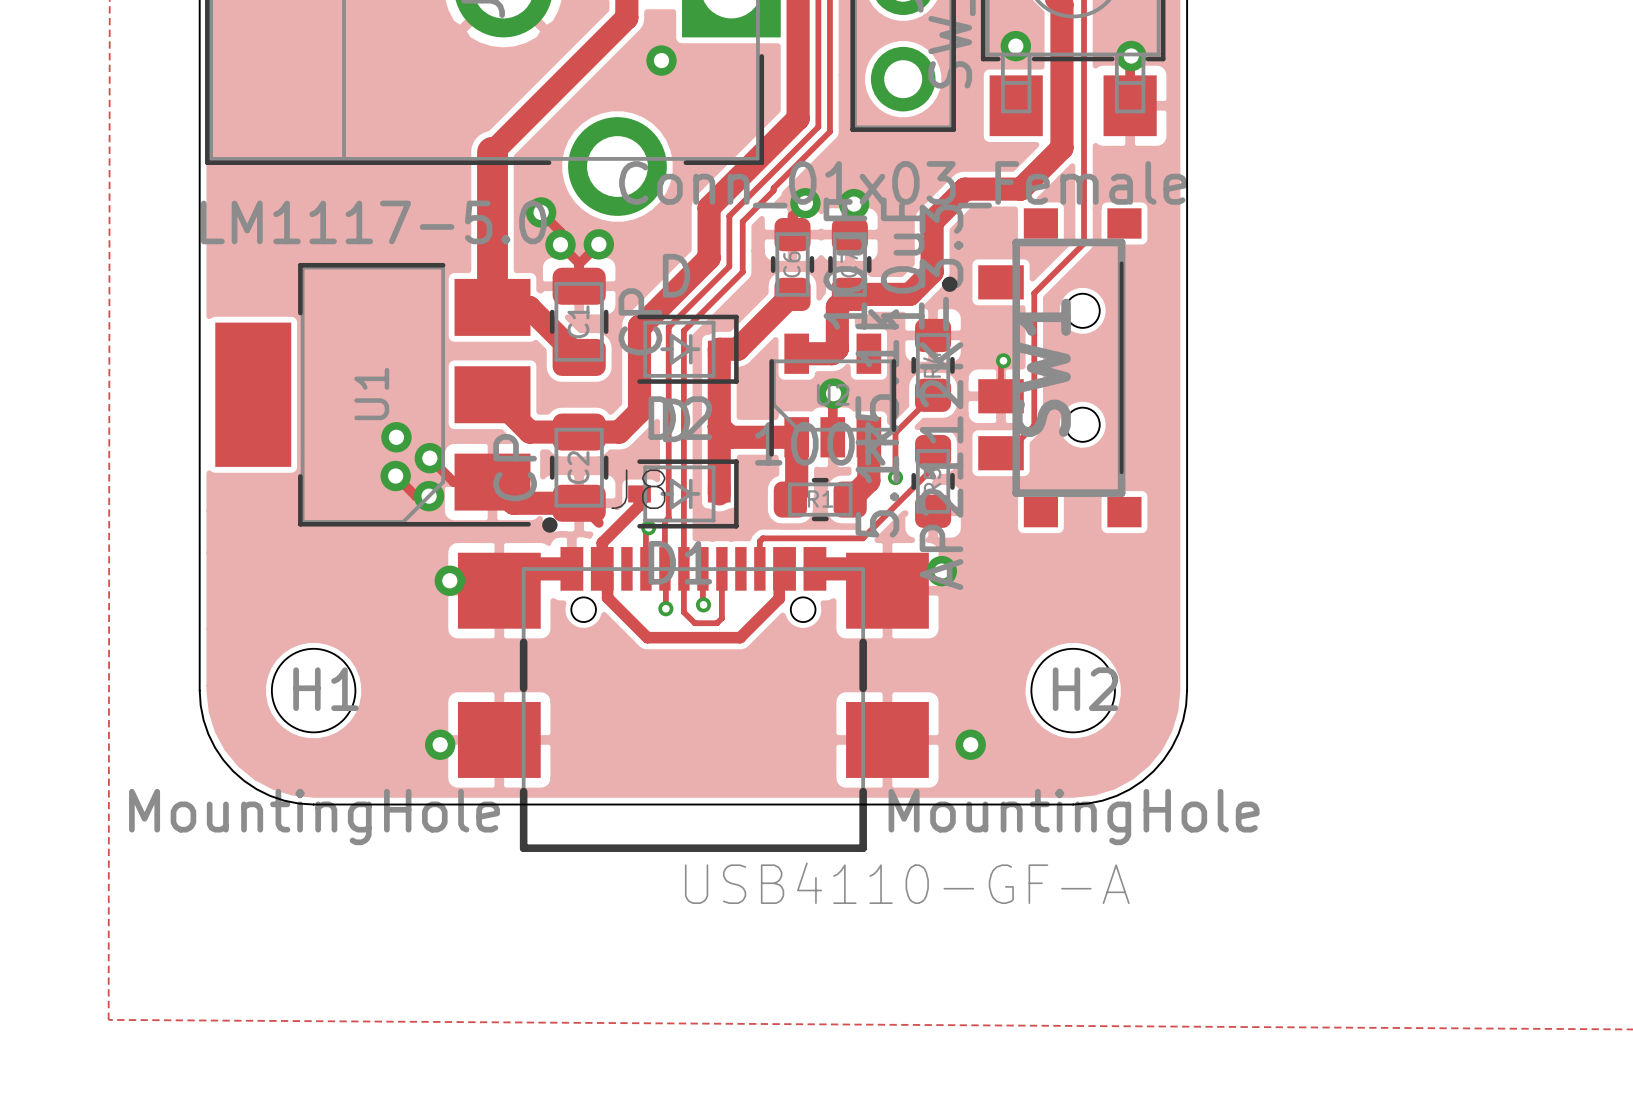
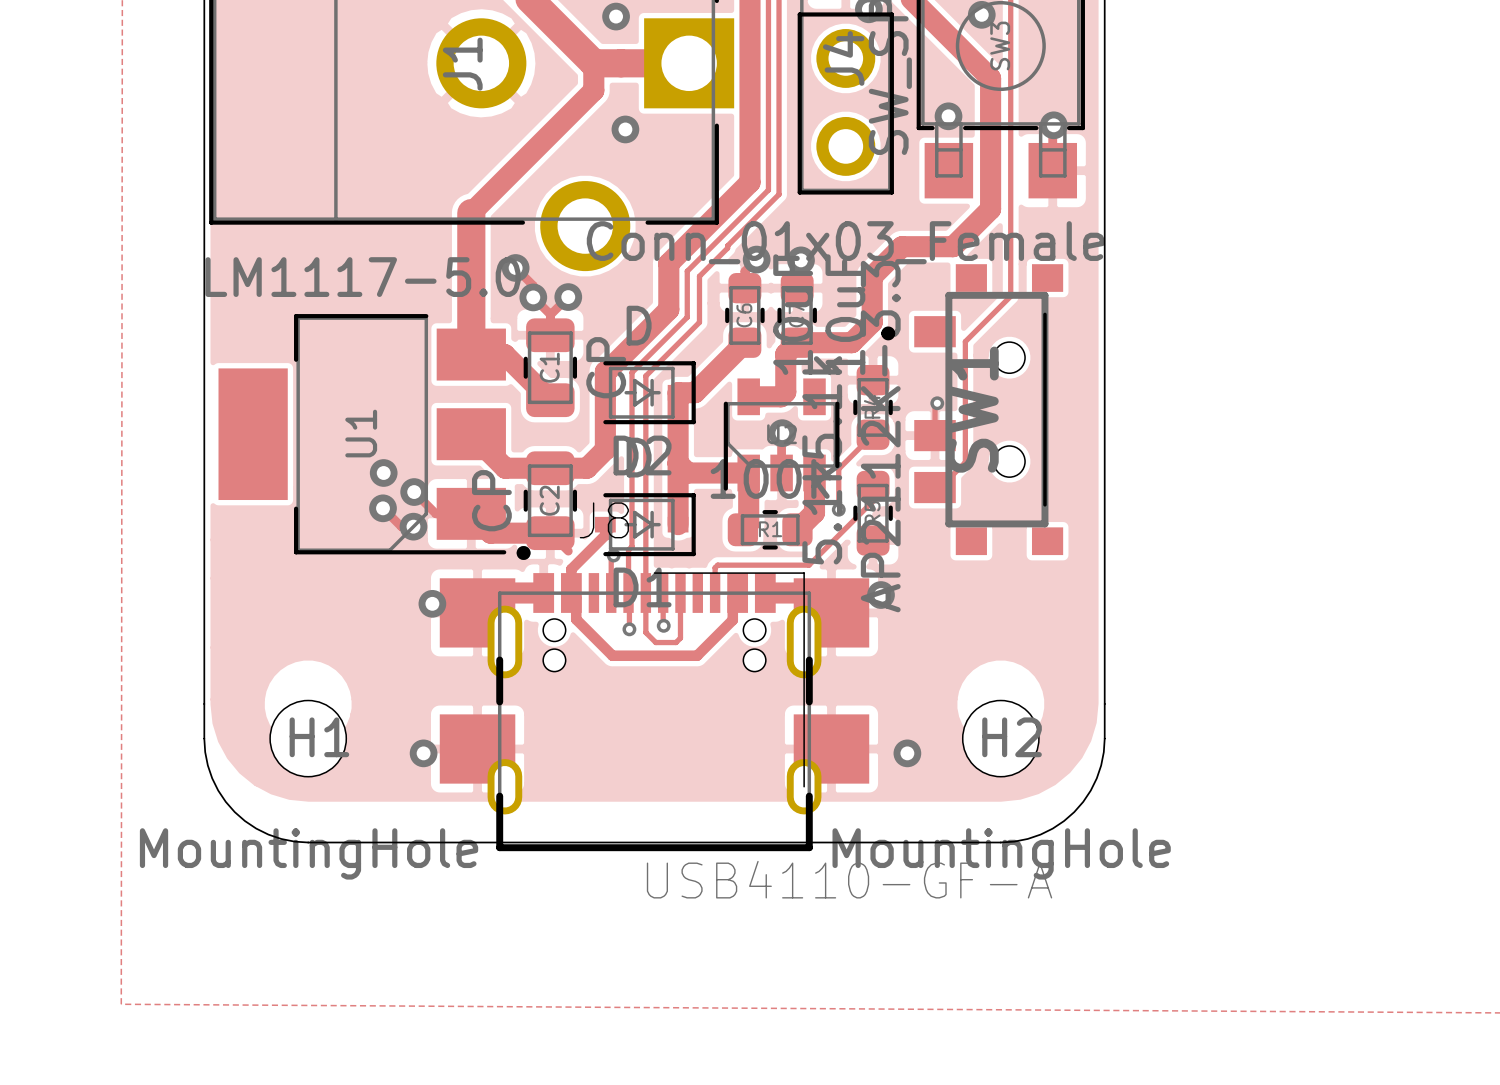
J8 footprint: [457, 517, 929, 852] -> [439, 546, 870, 852]
board edge: (199, 690) (200, 705) (208, 734) (214, 747) (233, 771) (256, 789) (270, 795) (298, 803) (313, 804) (1088, 803) (1116, 795) (1130, 789) (1142, 780) (1163, 759) (1178, 734) (1186, 705) (1187, 690) -> (204, 703) (204, 738) (207, 765) (212, 778) (225, 801) (244, 821) (268, 834) (294, 841) (308, 842) (1014, 841) (1040, 834) (1052, 828) (1074, 812) (1090, 790) (1096, 778) (1103, 752) (1104, 703)
H1 position: (313, 690) -> (308, 738)
H2 position: (1073, 690) -> (1000, 738)

